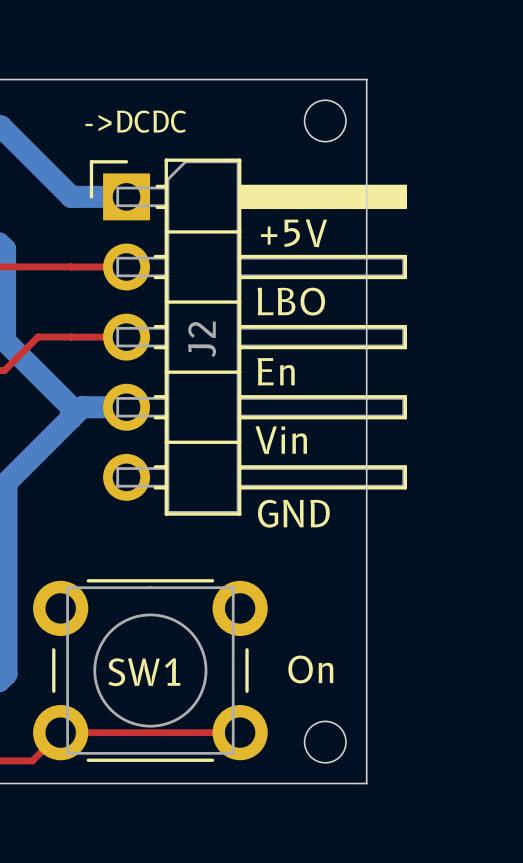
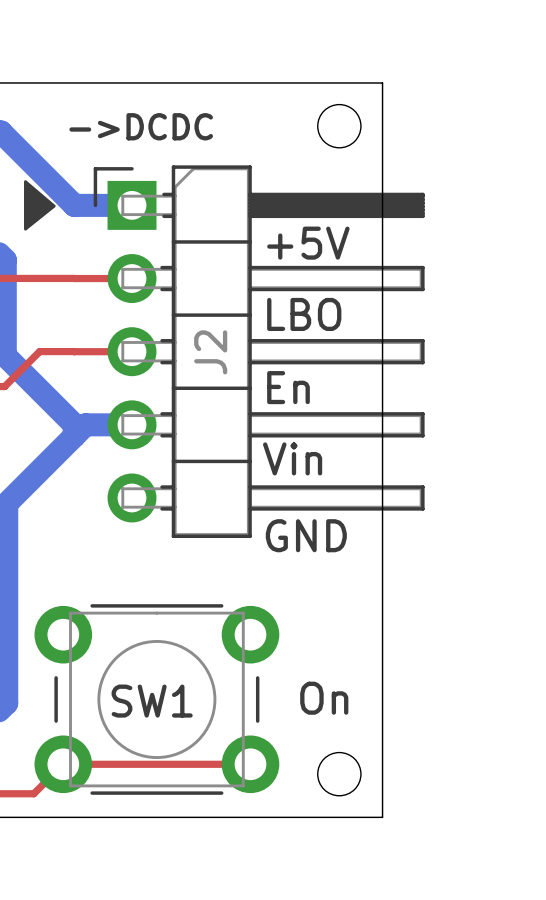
drawing: none -> [24, 180, 56, 231]

